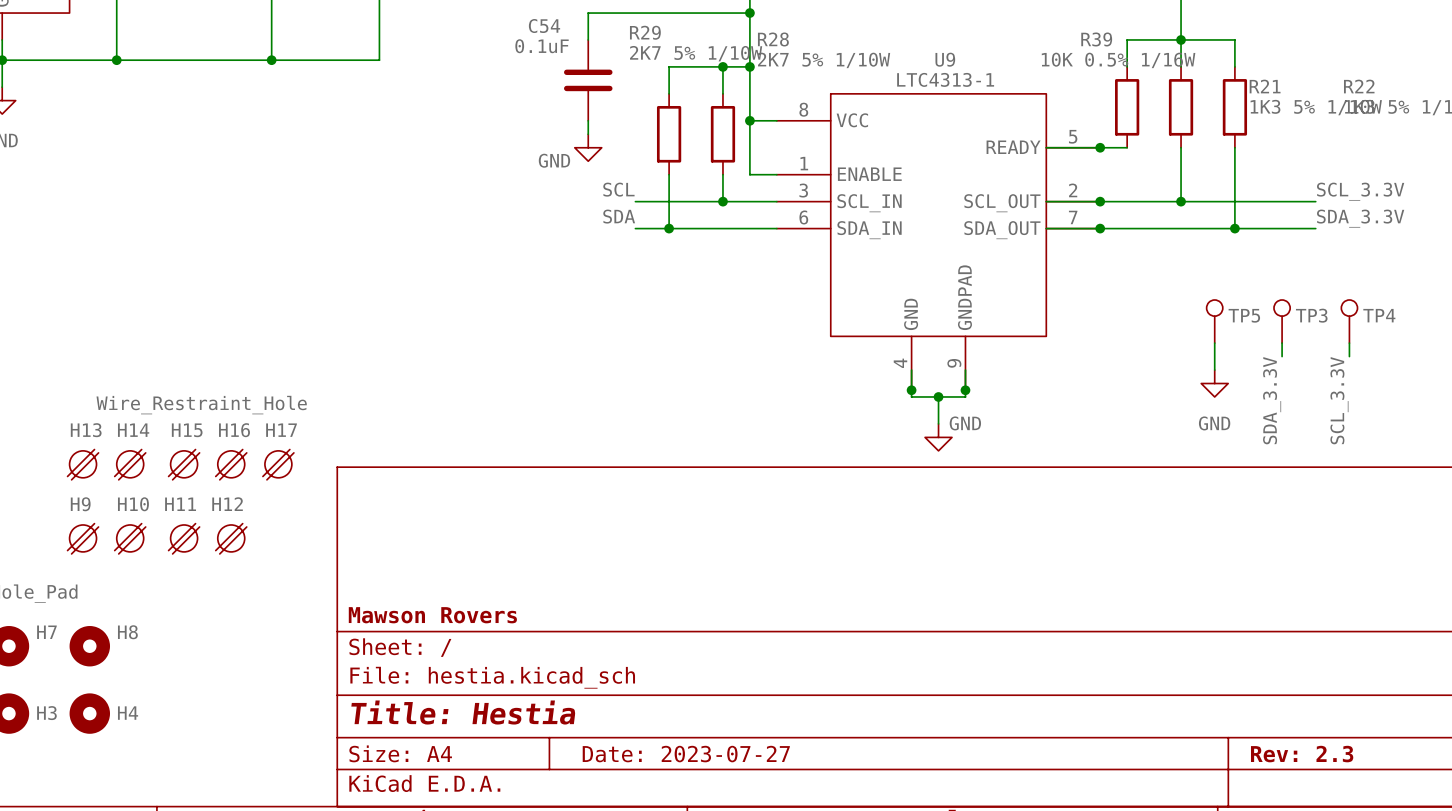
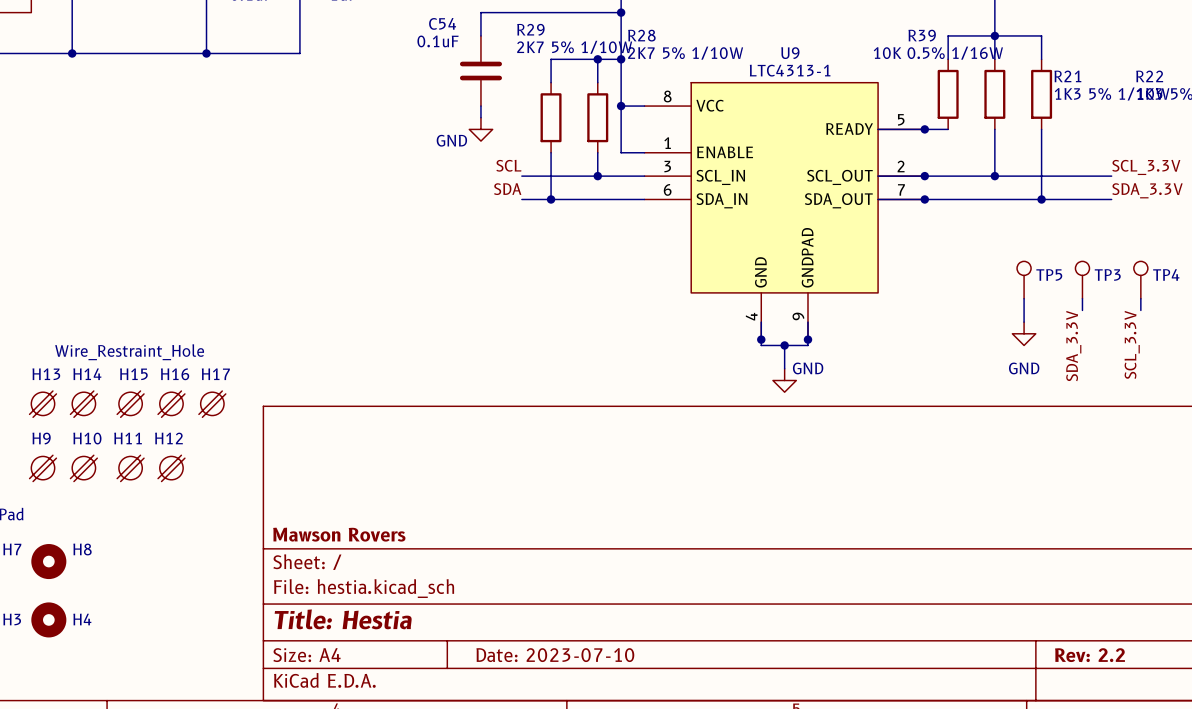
title block: Date: 2023-07-27 (686, 754) -> Date: 2023-07-10 (555, 655)
title block: Rev: 2.3 (1302, 754) -> Rev: 2.2 (1089, 655)

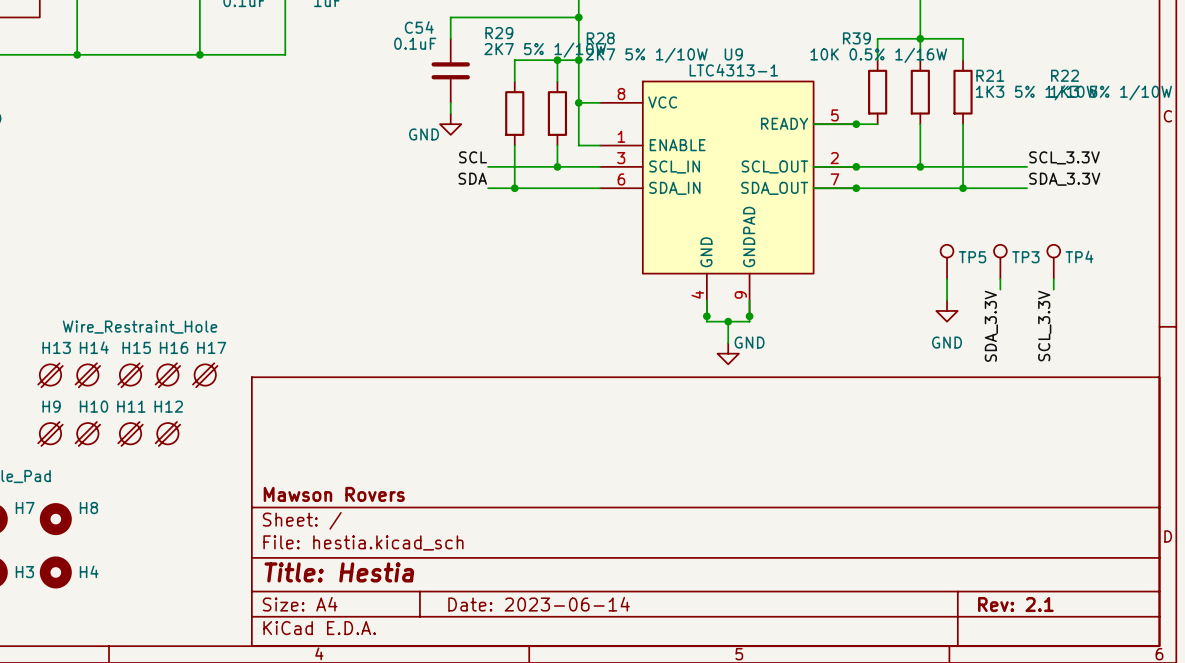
title block: Date: 2023-07-10 (555, 655) -> Date: 2023-06-14 (539, 604)
title block: Rev: 2.2 (1089, 655) -> Rev: 2.1 (1015, 604)

